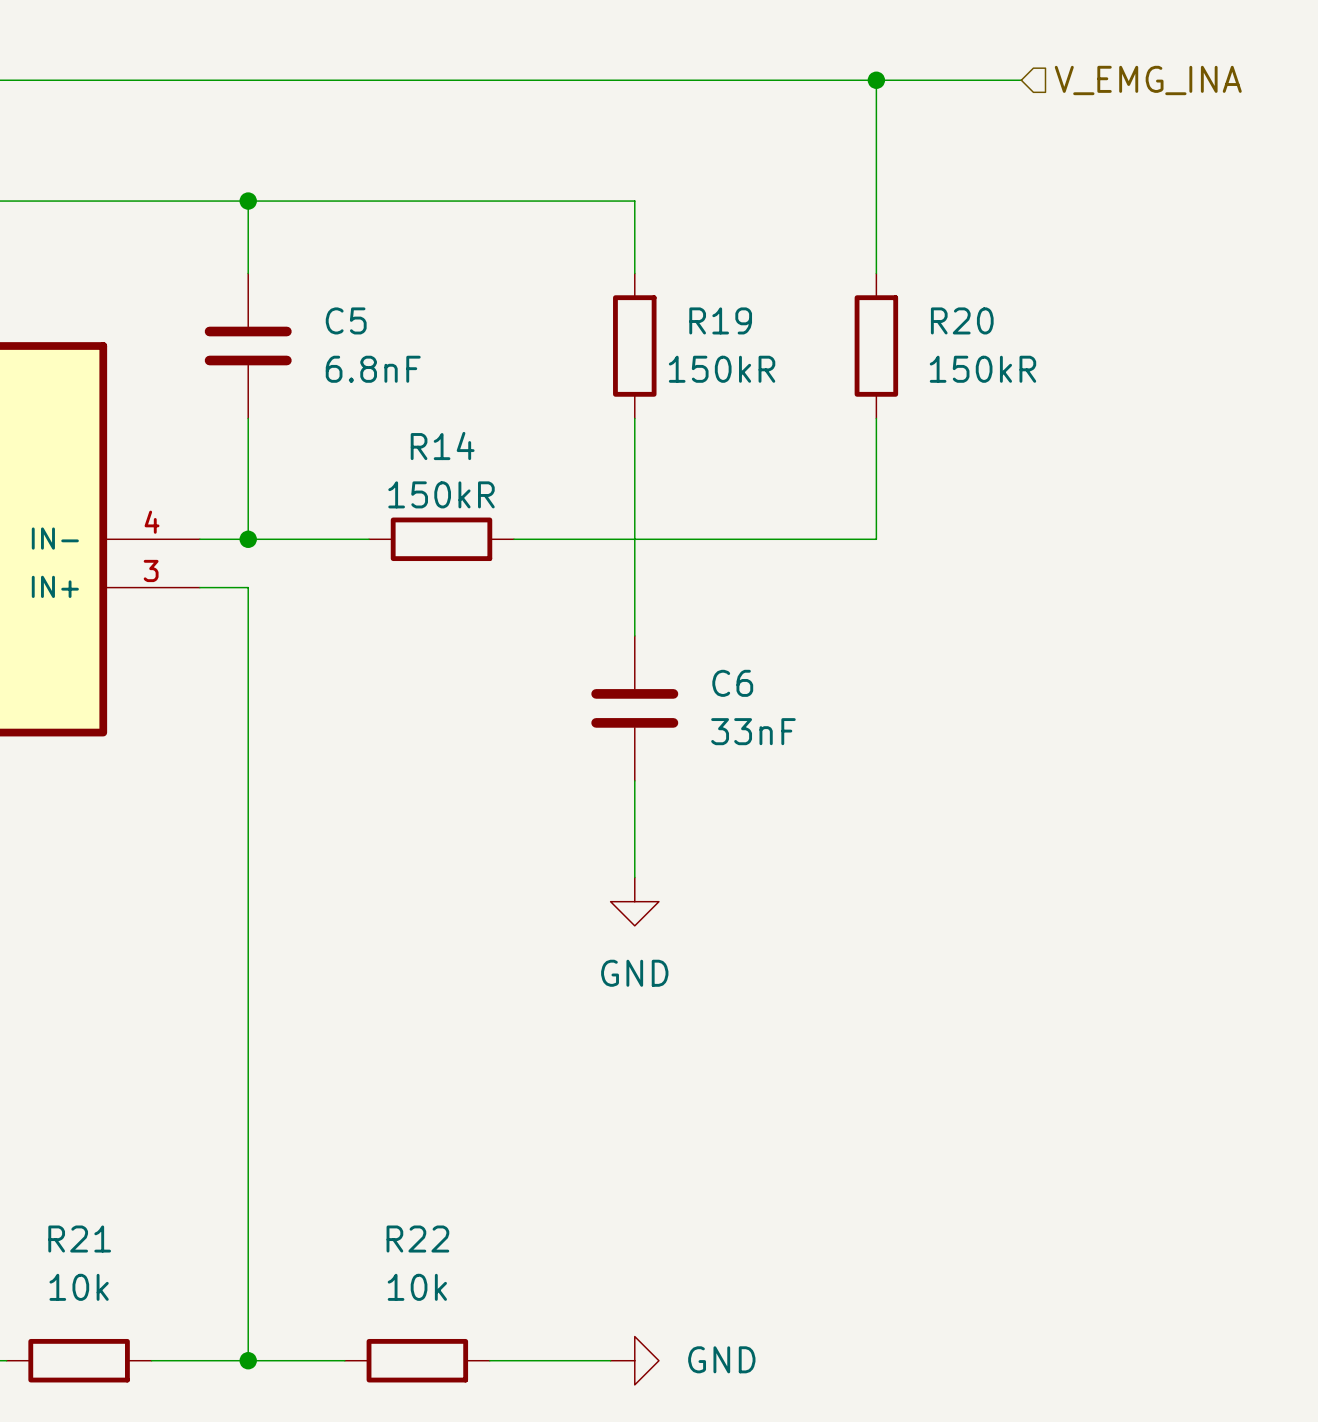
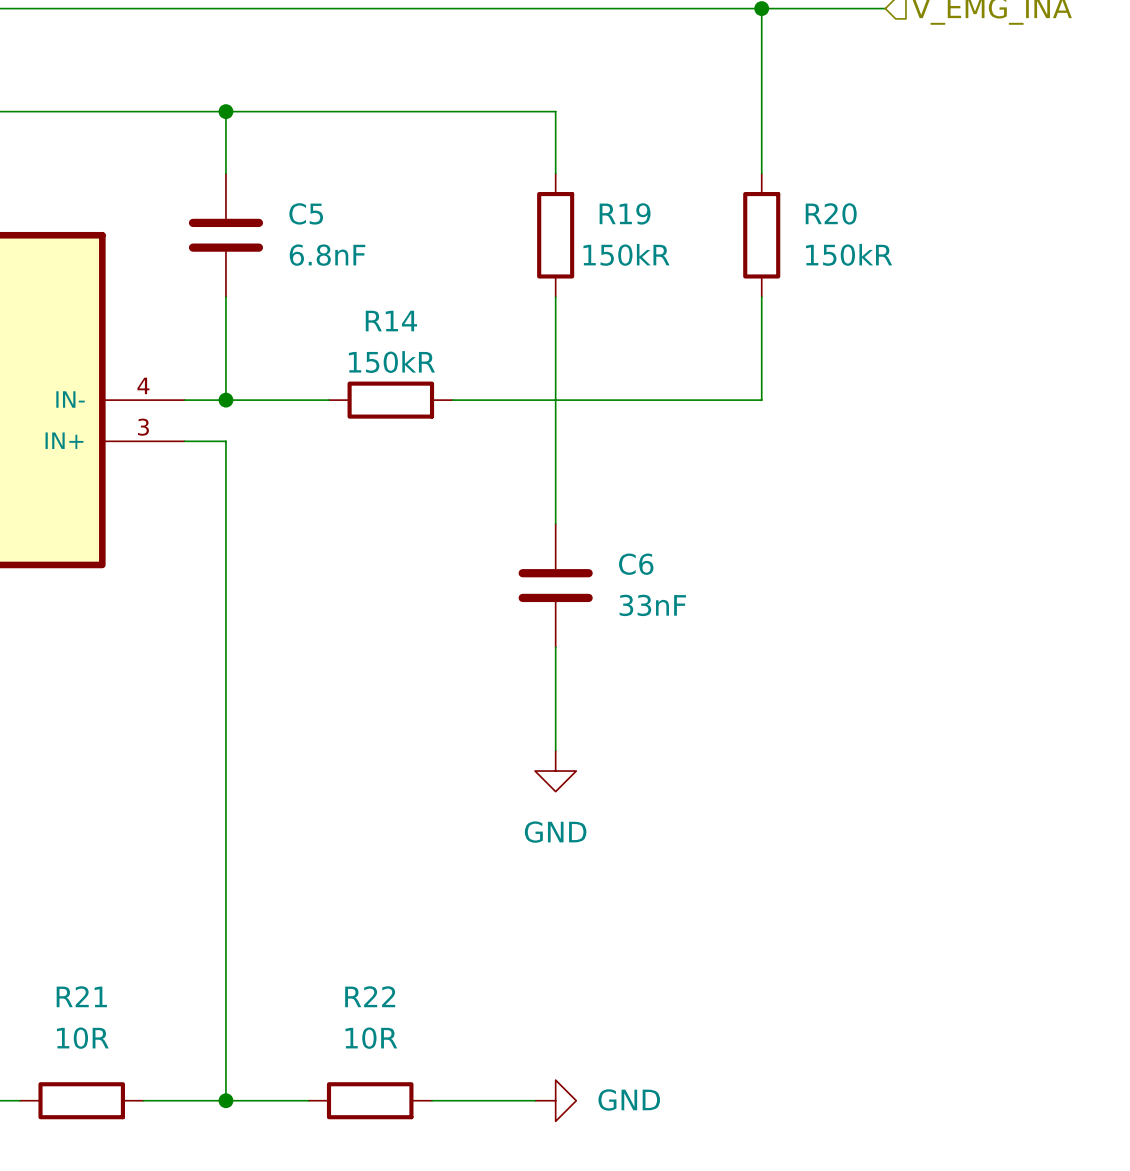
C6 position: (634, 708) -> (555, 585)
wire: none -> (555, 688) (555, 750)
power symbol position: GND (634, 901) -> GND (555, 771)
R21 value: 10k (79, 1287) -> 10R (82, 1038)
R22 value: 10k (417, 1287) -> 10R (371, 1038)

